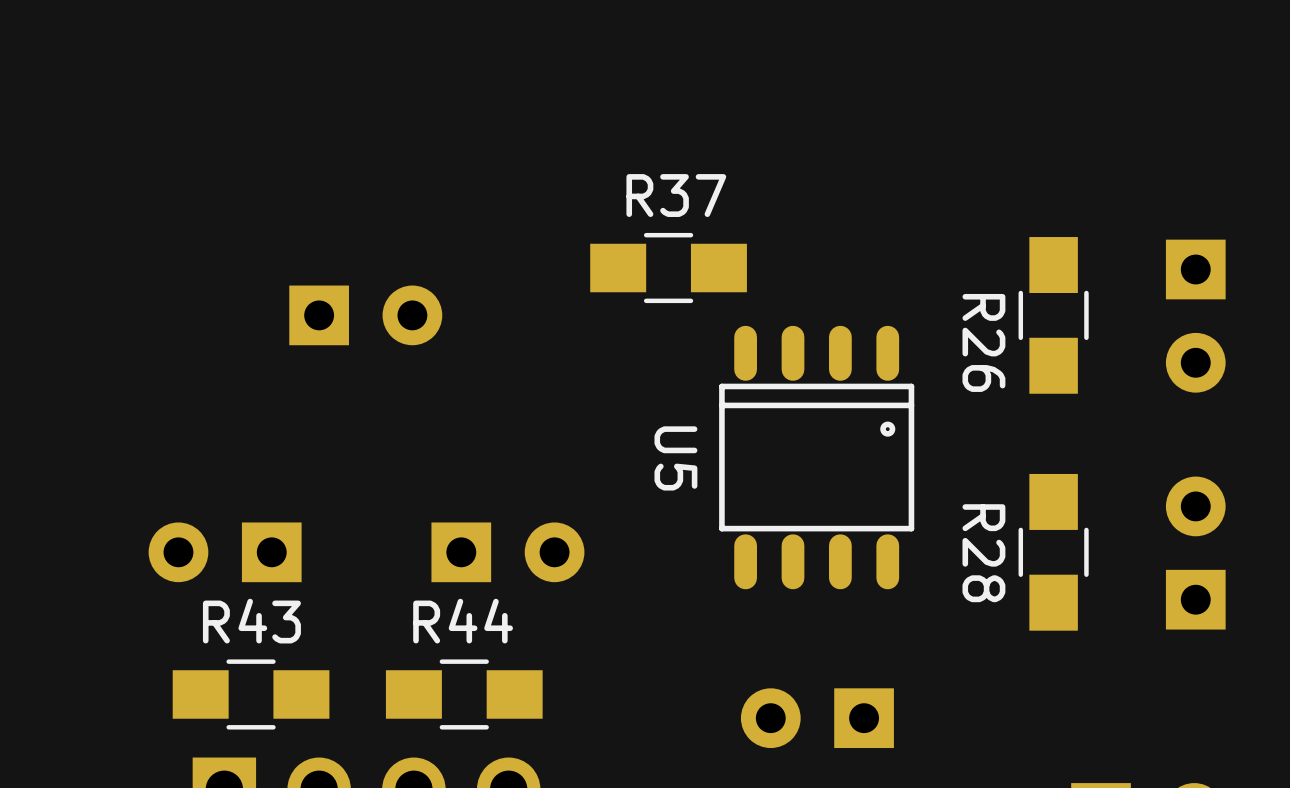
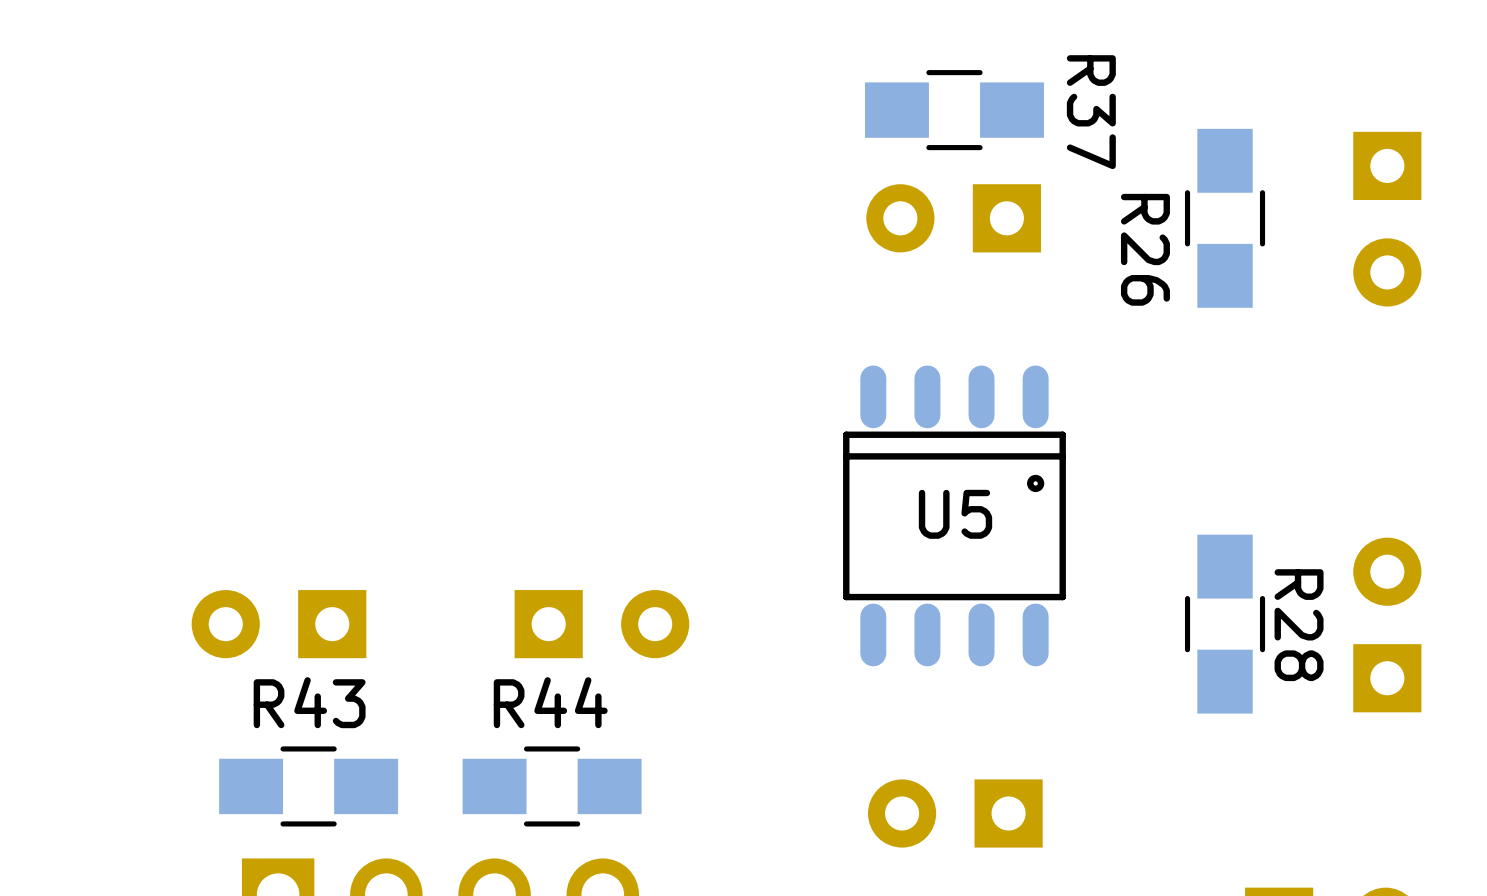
R37 name rotation: 0° (676, 195) -> 90° clockwise (1091, 112)
R37 name position: R37 (676, 195) -> R37 (1091, 112)
part: none -> (953, 218)
R37 position: (668, 268) -> (954, 110)
part: (365, 315) -> none
R26 position: (1053, 315) -> (1225, 218)
part position: (1195, 316) -> (1387, 219)
U5 name rotation: 0° (675, 458) -> 90° counterclockwise (955, 514)
U5 name position: U5 (675, 458) -> U5 (955, 514)
R28 name position: R28 (983, 553) -> R28 (1299, 625)

